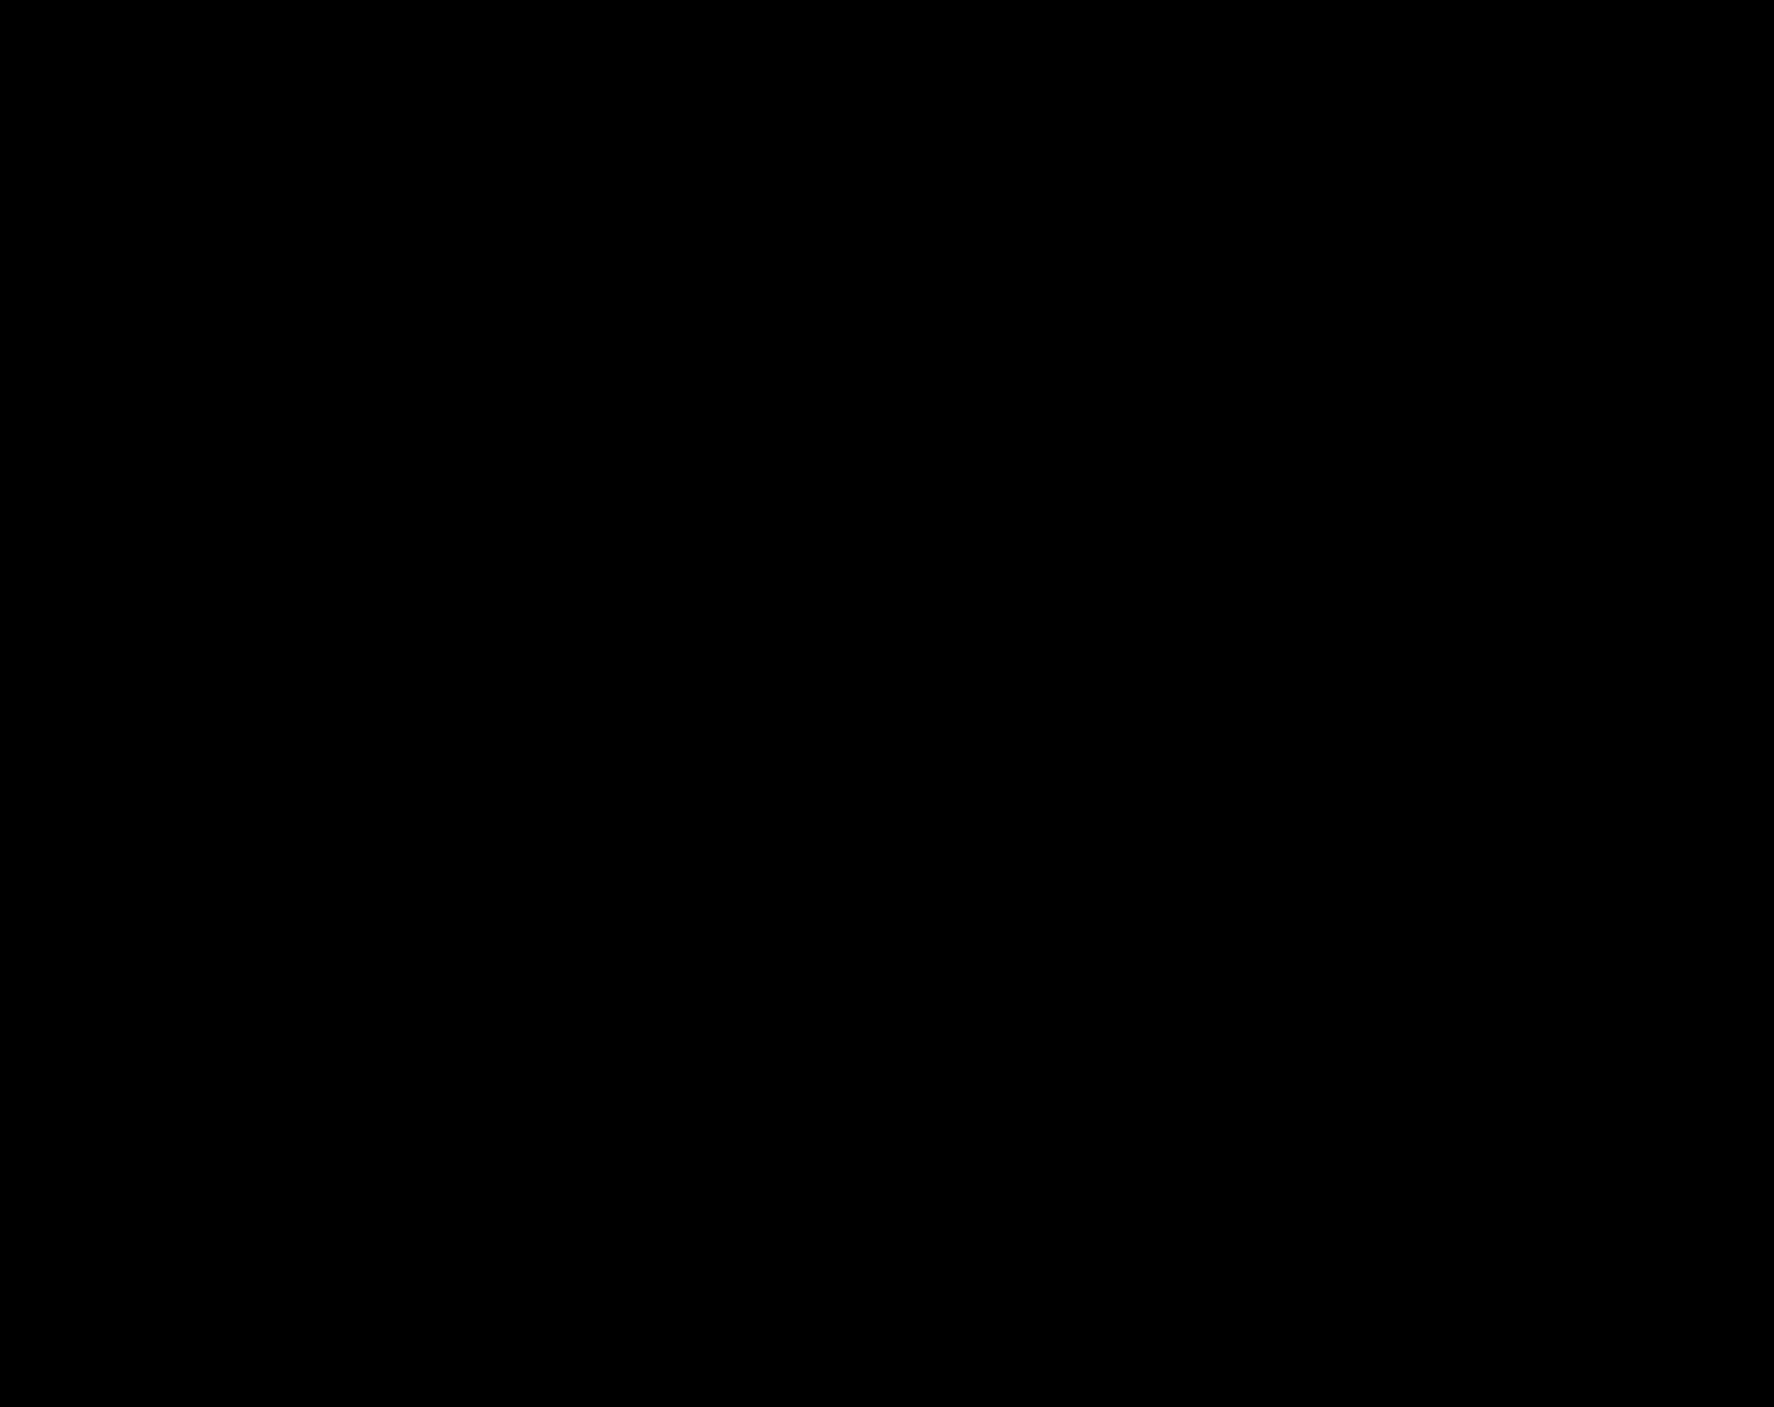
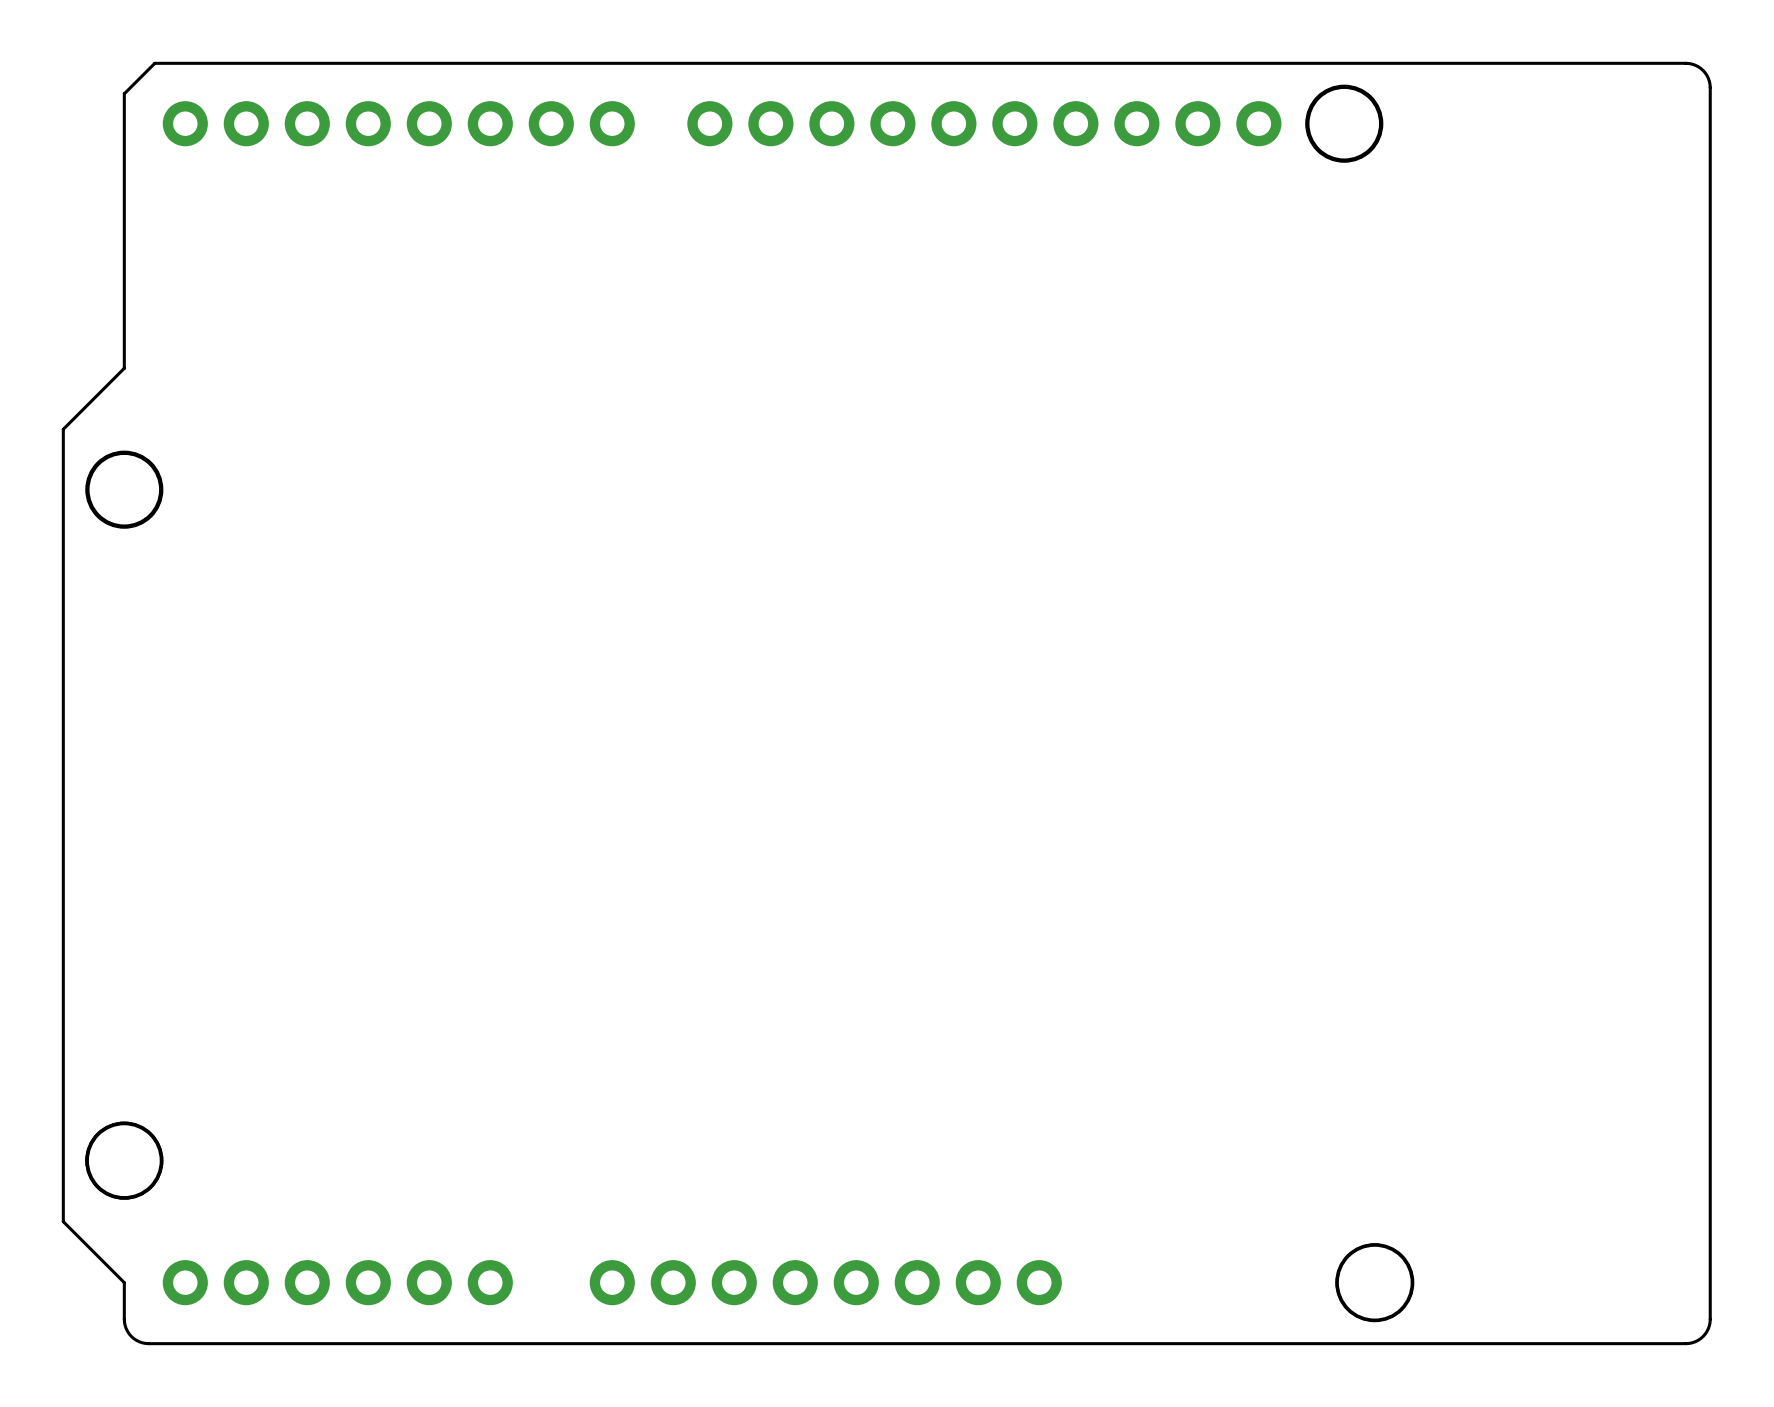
part: none -> (886, 703)

